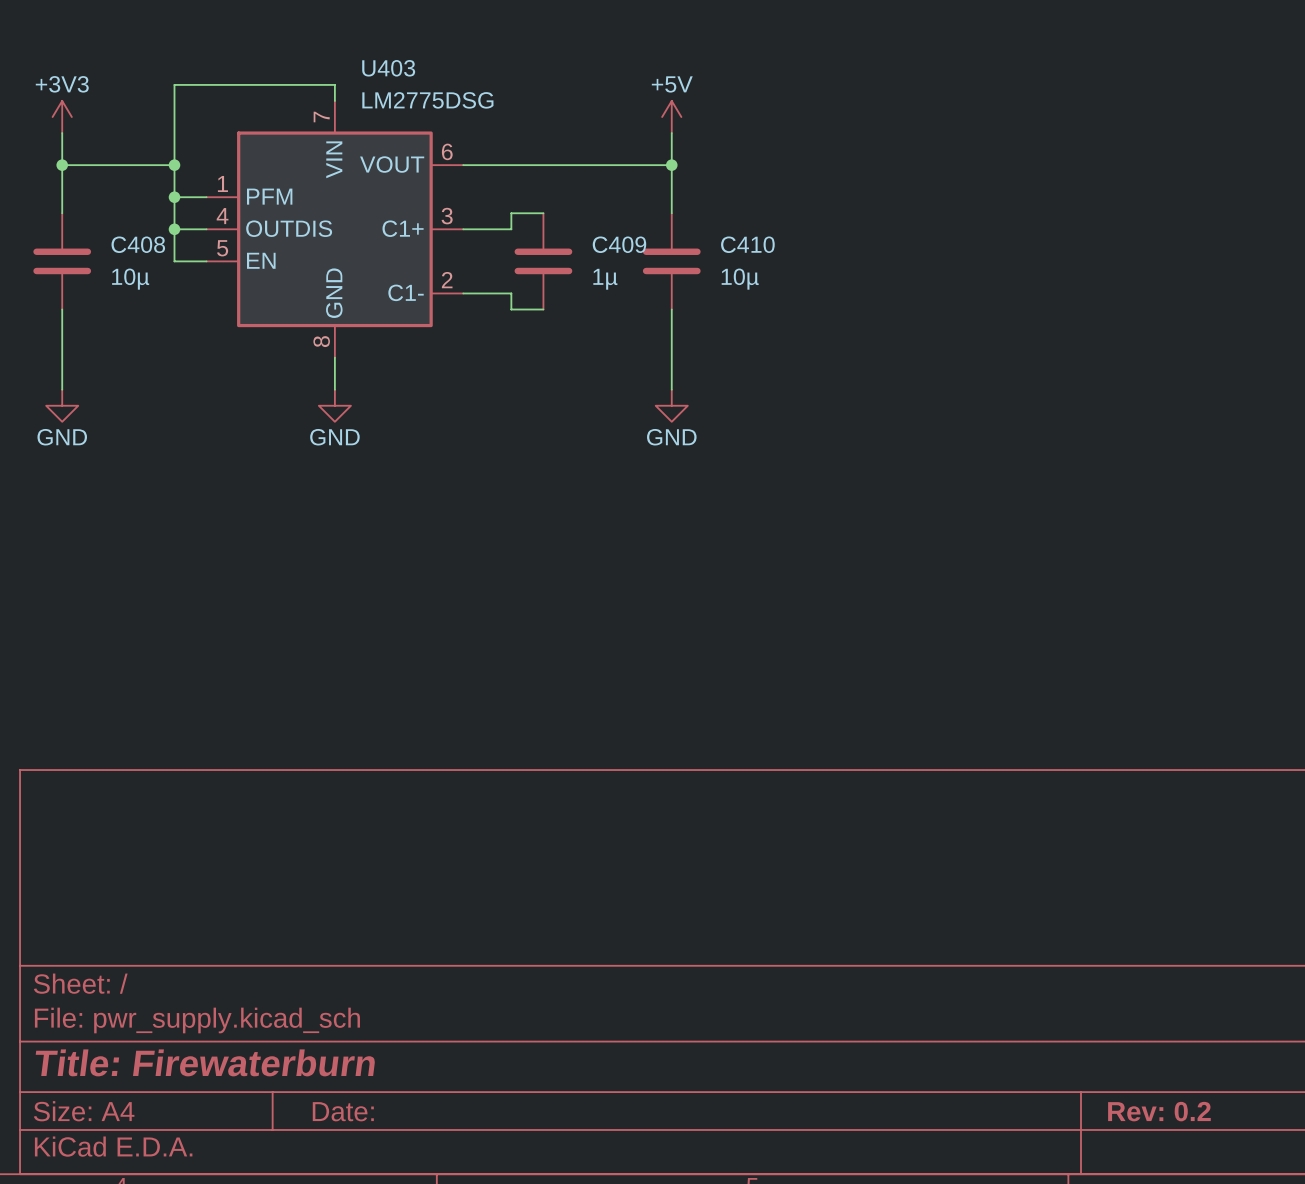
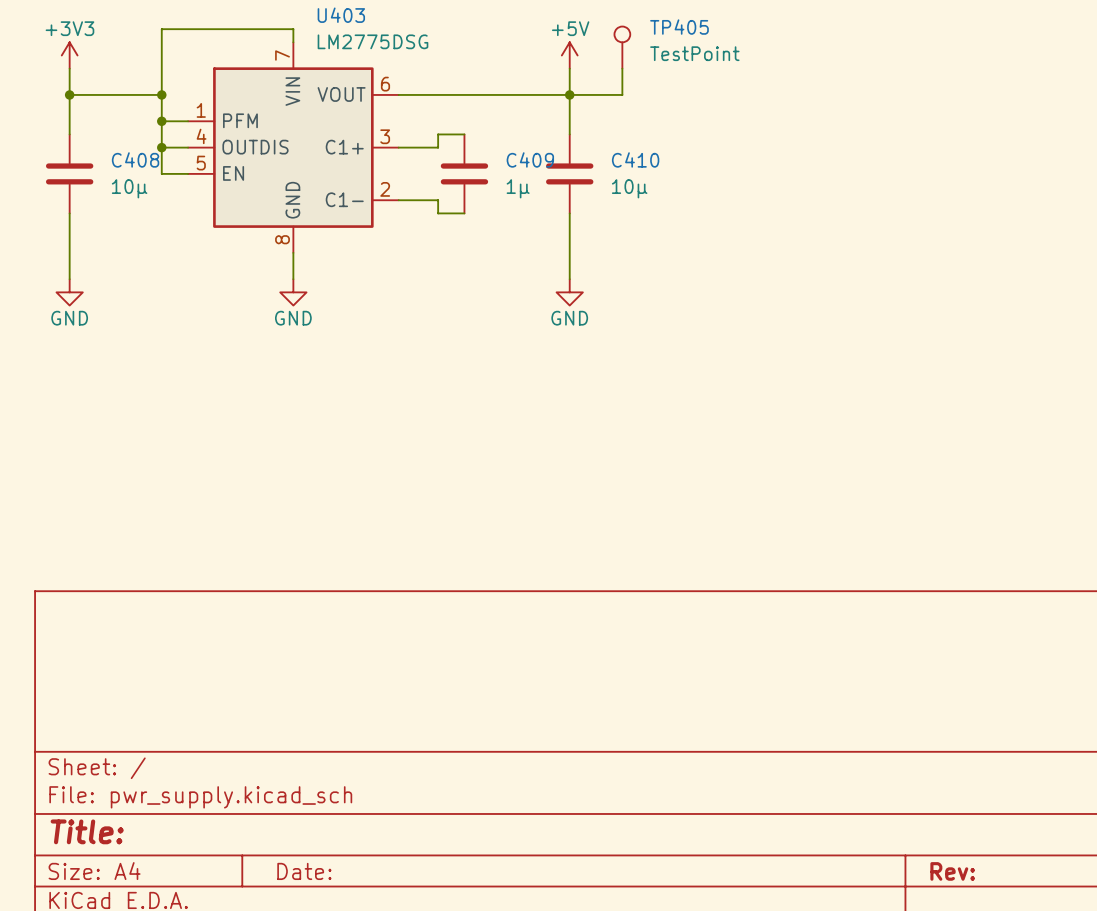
TP405: none -> TestPoint (622, 47)
wire: none -> (622, 68) (622, 94) (569, 94)
title block: Title: Firewaterburn (205, 1062) -> Title: (87, 831)
title block: Rev: 0.2 (1159, 1111) -> Rev: (952, 871)

